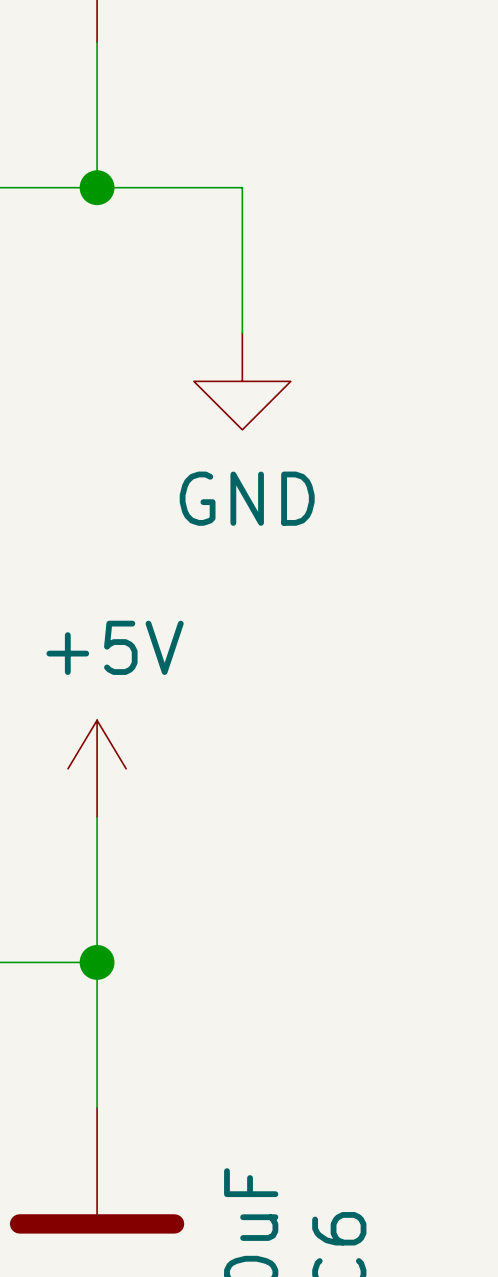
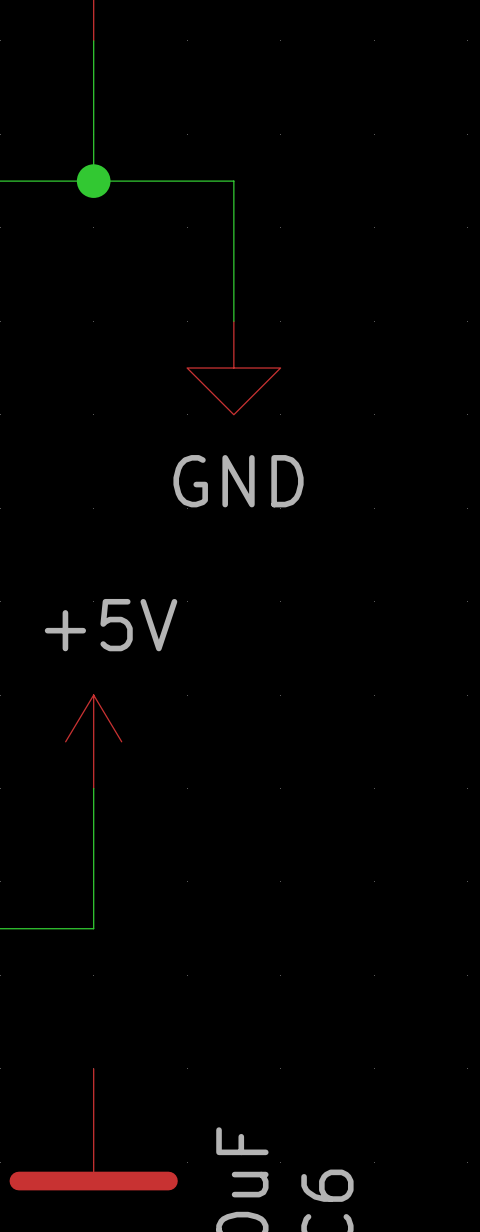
wire: (97, 962) (97, 1107) -> none
junction: (97, 962) -> none

